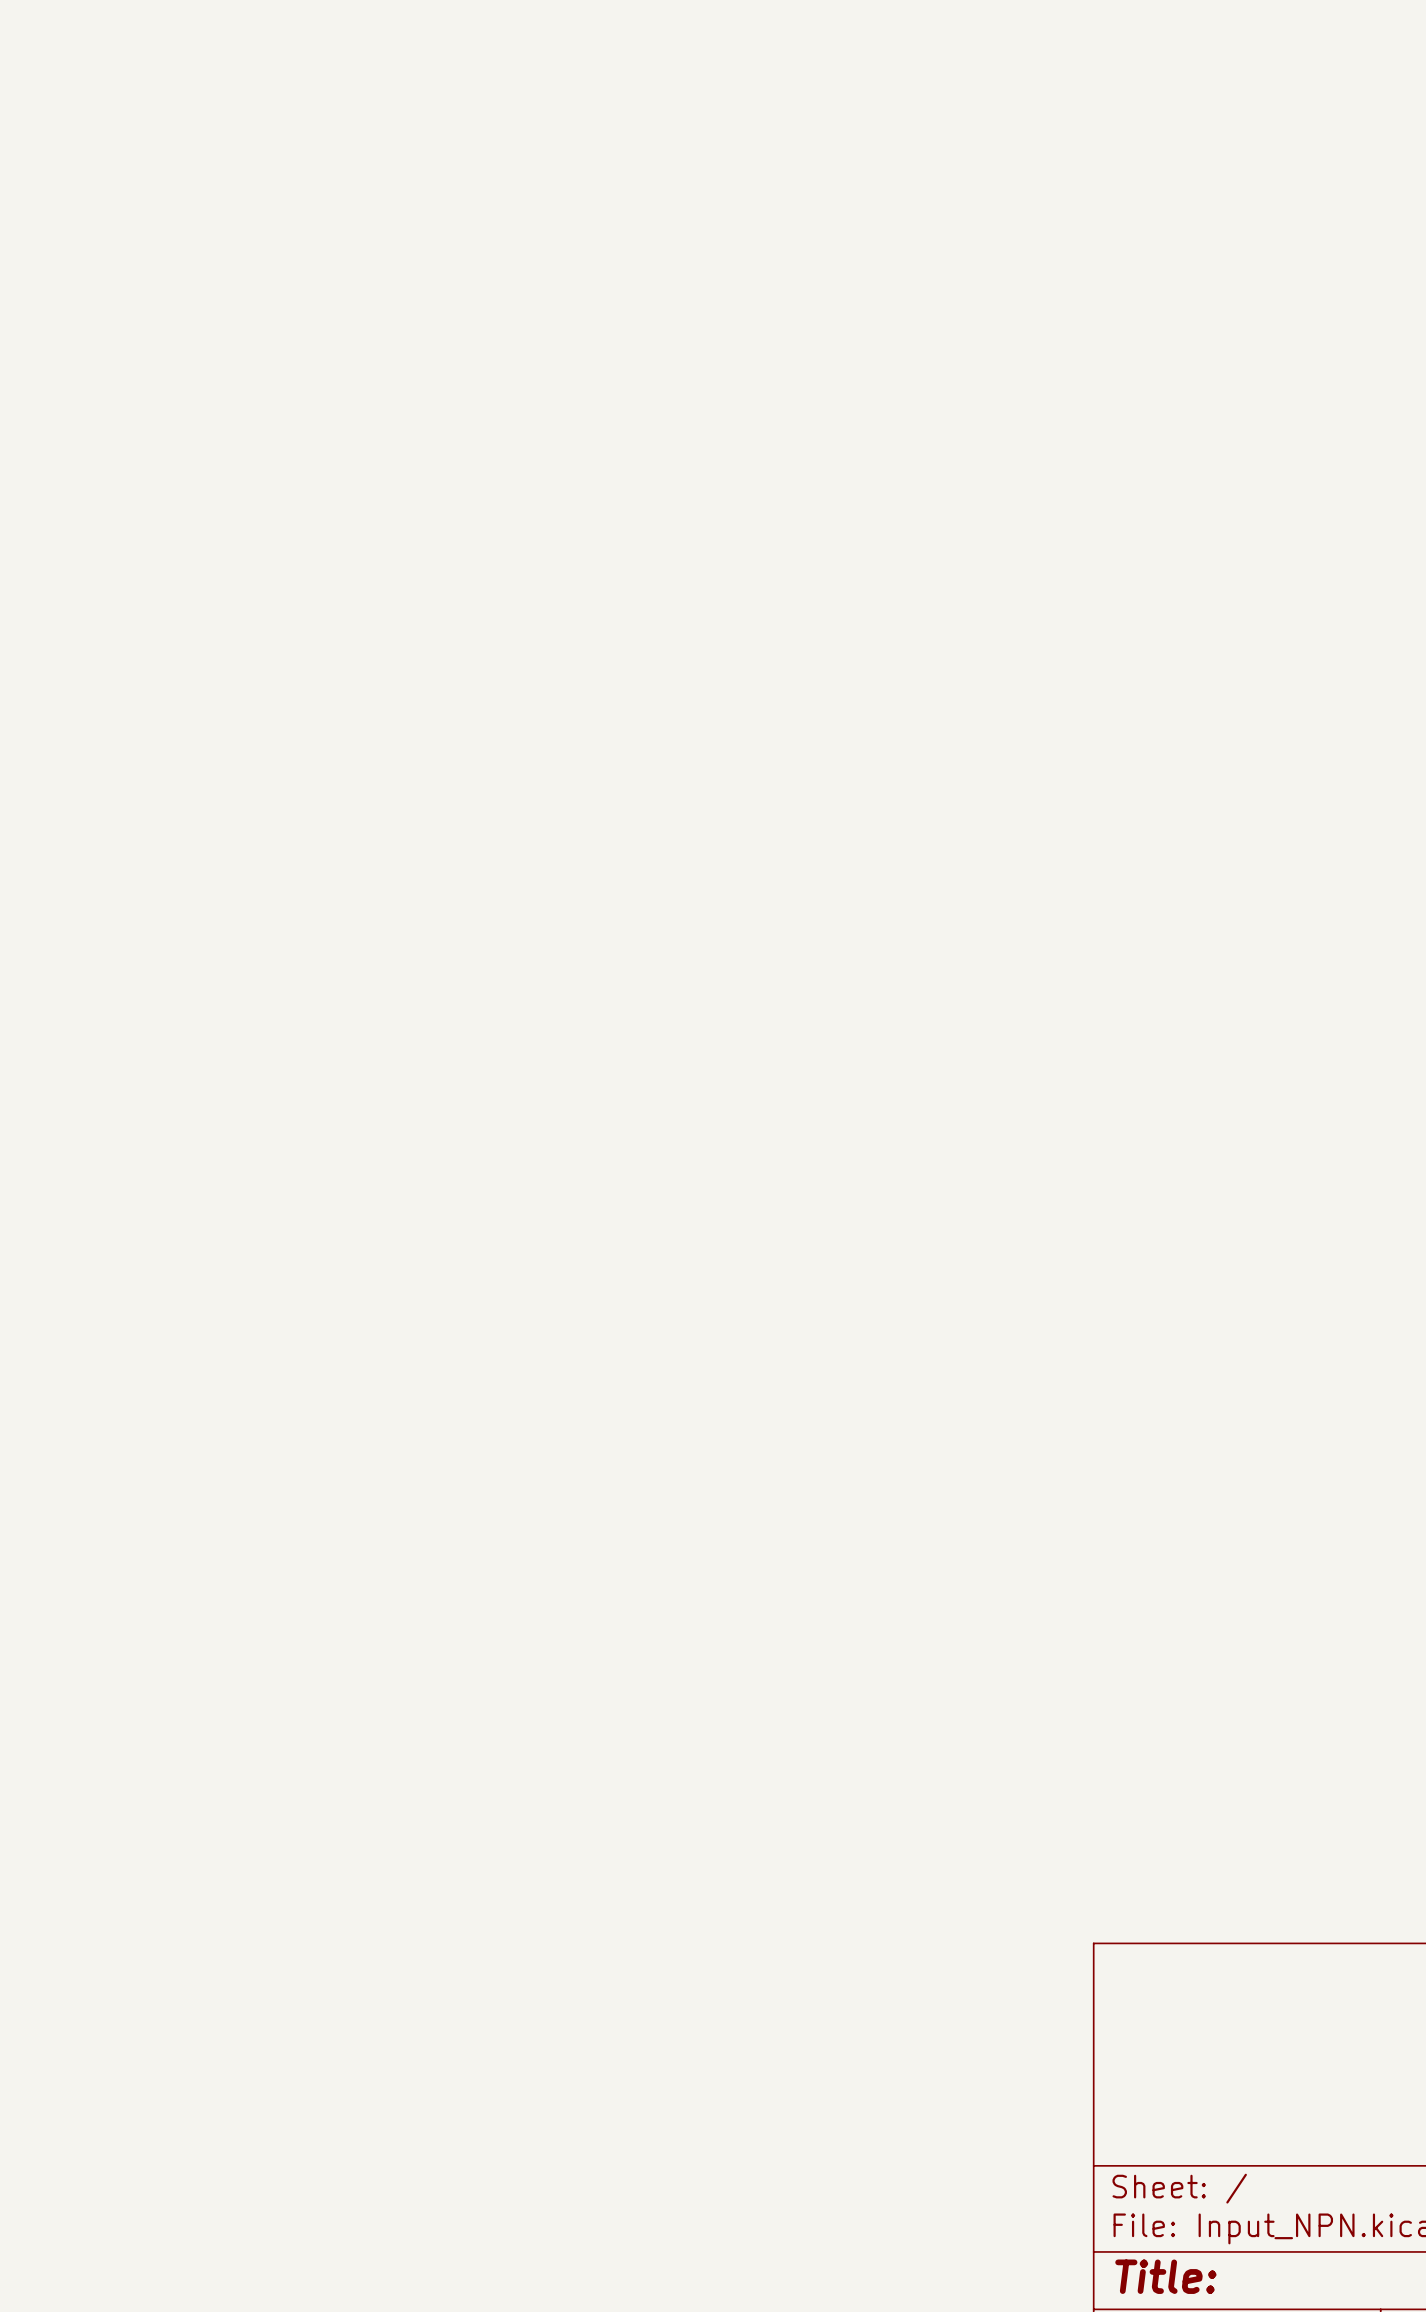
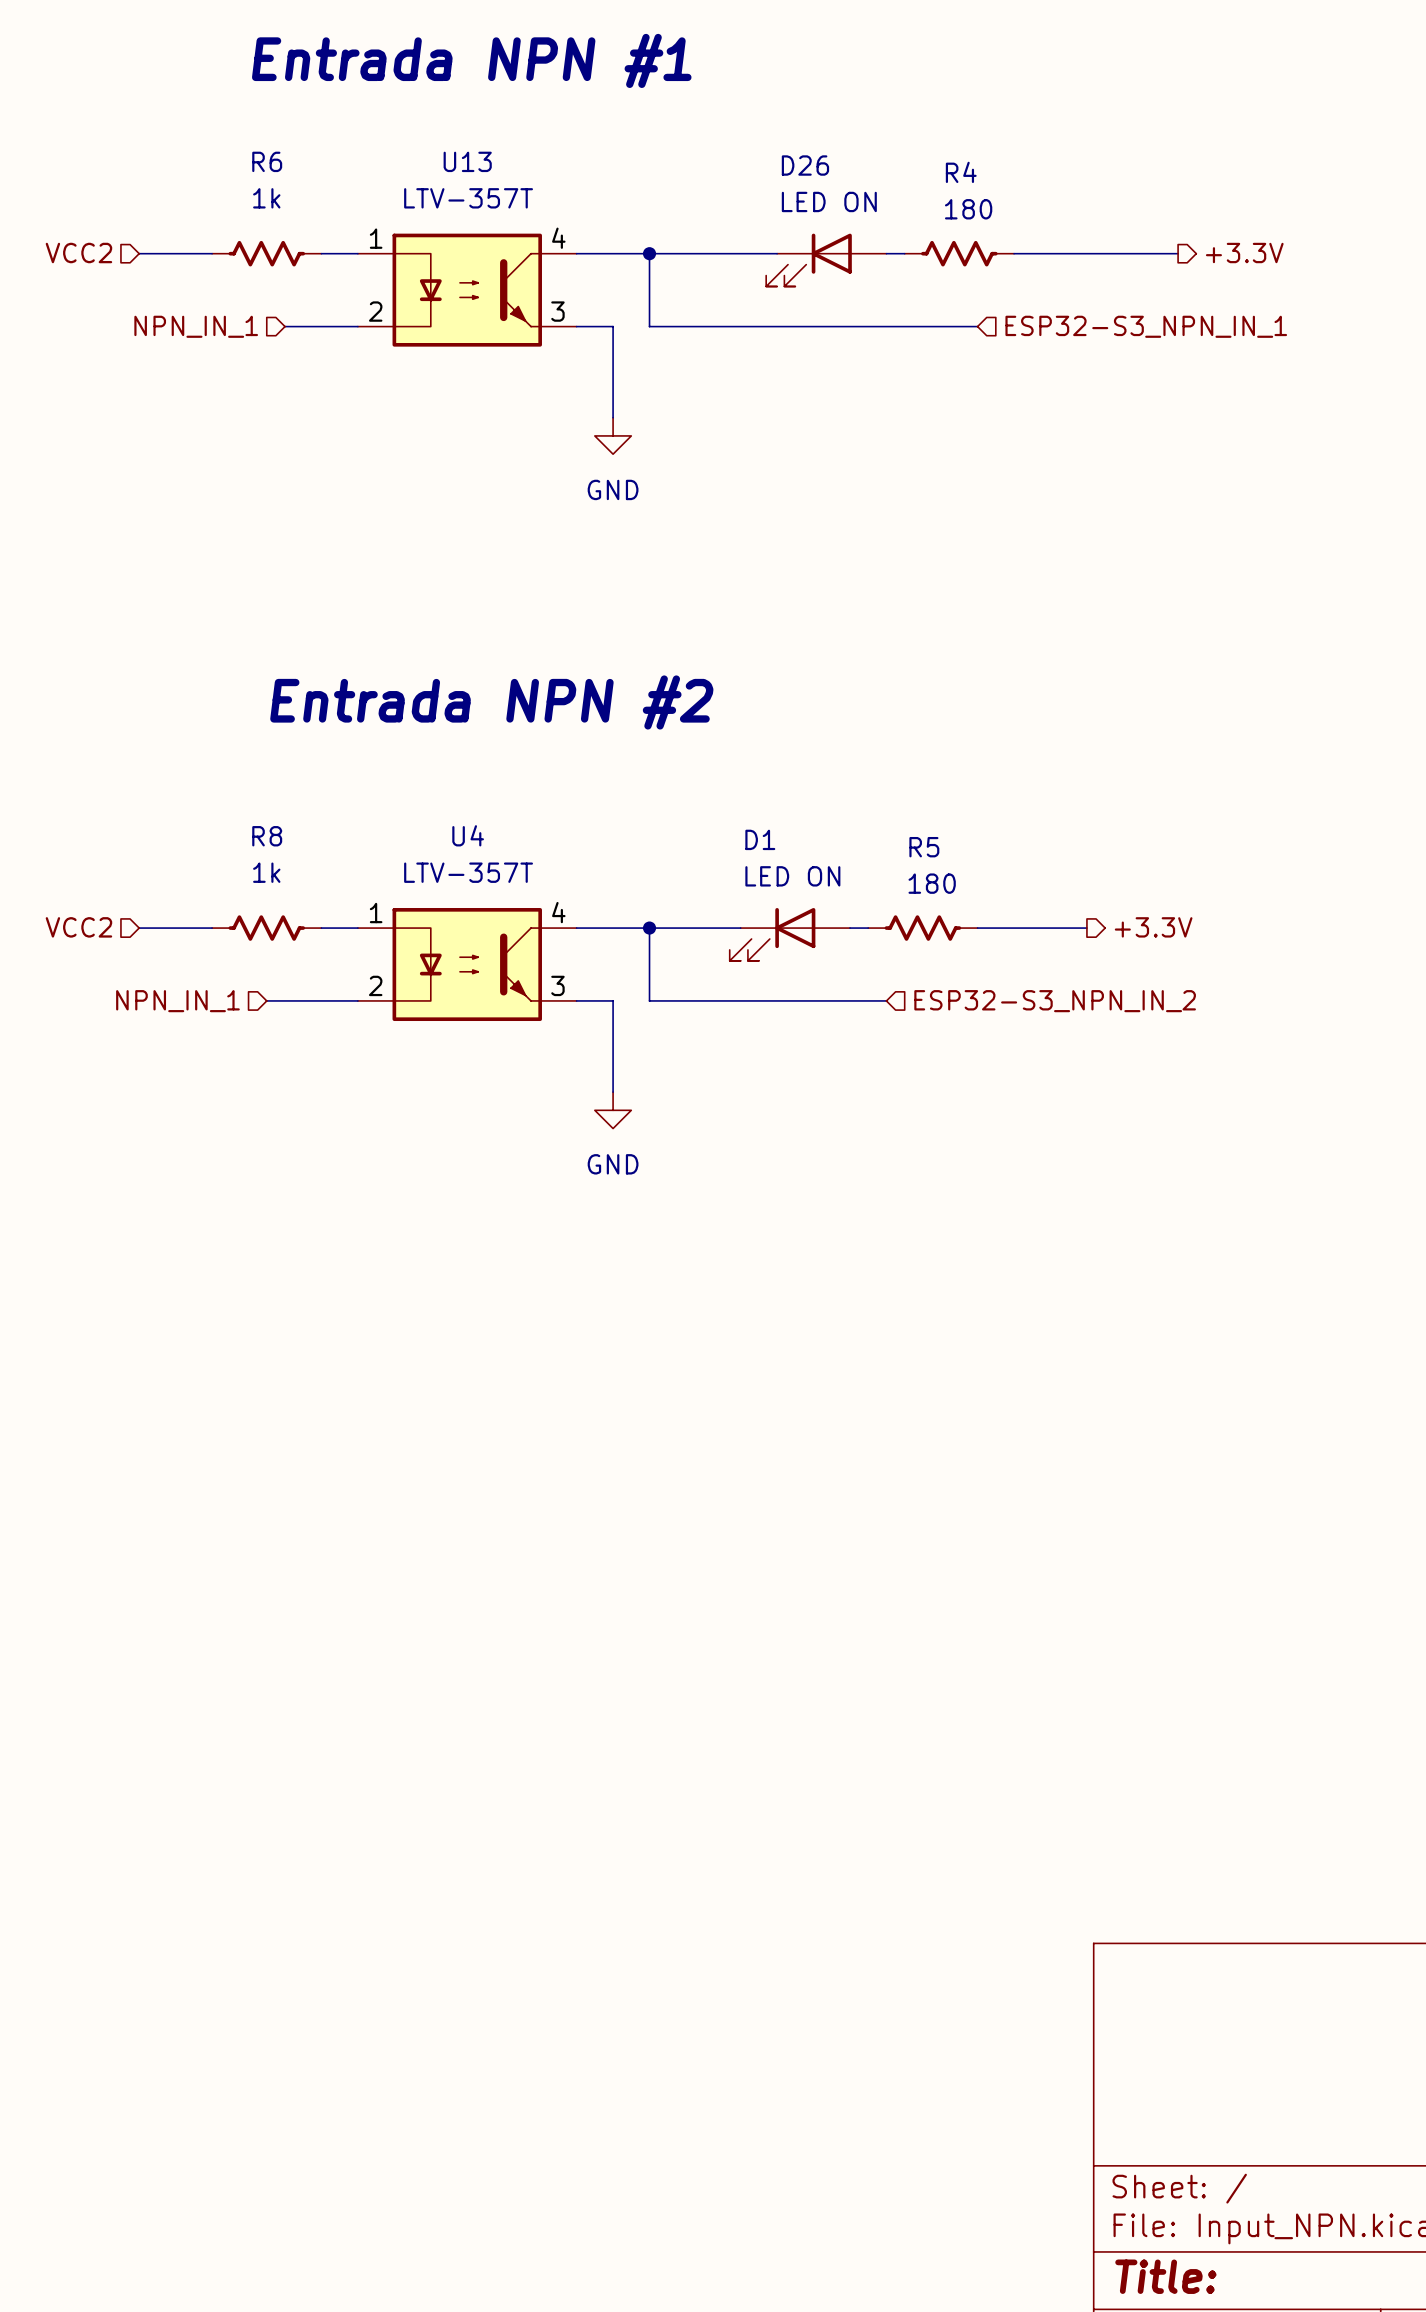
text: none -> Entrada NPN #1 (471, 60)
hierarchical label: none -> VCC2 (78, 253)
wire: none -> (139, 253) (212, 253)
R6: none -> 1k (266, 253)
wire: none -> (321, 253) (357, 253)
wire: none -> (576, 253) (777, 253)
wire: none -> (649, 253) (649, 326) (977, 326)
junction: none -> (649, 253)
wire: none -> (886, 253) (904, 253)
R4: none -> 180 (959, 253)
wire: none -> (1014, 253) (1178, 253)
hierarchical label: none -> +3.3V (1244, 253)
D26: none -> LED ON (826, 260)
U13: none -> LTV-357T (467, 290)
hierarchical label: none -> NPN_IN_1 (196, 326)
wire: none -> (284, 326) (357, 326)
wire: none -> (576, 326) (613, 326) (613, 417)
hierarchical label: none -> ESP32-S3_NPN_IN_1 (1146, 326)
power symbol: none -> GND (613, 435)
text: none -> Entrada NPN #2 (491, 702)
hierarchical label: none -> VCC2 (78, 927)
hierarchical label: none -> +3.3V (1153, 927)
wire: none -> (139, 928) (212, 928)
R8: none -> 1k (266, 928)
wire: none -> (321, 928) (357, 928)
wire: none -> (576, 928) (740, 928)
wire: none -> (649, 928) (649, 1000) (886, 1000)
junction: none -> (649, 928)
wire: none -> (850, 928) (868, 928)
R5: none -> 180 (922, 928)
wire: none -> (977, 928) (1086, 928)
D1: none -> LED ON (789, 934)
U4: none -> LTV-357T (467, 964)
wire: none -> (266, 1000) (357, 1000)
wire: none -> (576, 1000) (613, 1000) (613, 1092)
hierarchical label: none -> NPN_IN_1 (177, 1001)
hierarchical label: none -> ESP32-S3_NPN_IN_2 (1055, 1001)
power symbol: none -> GND (613, 1110)

